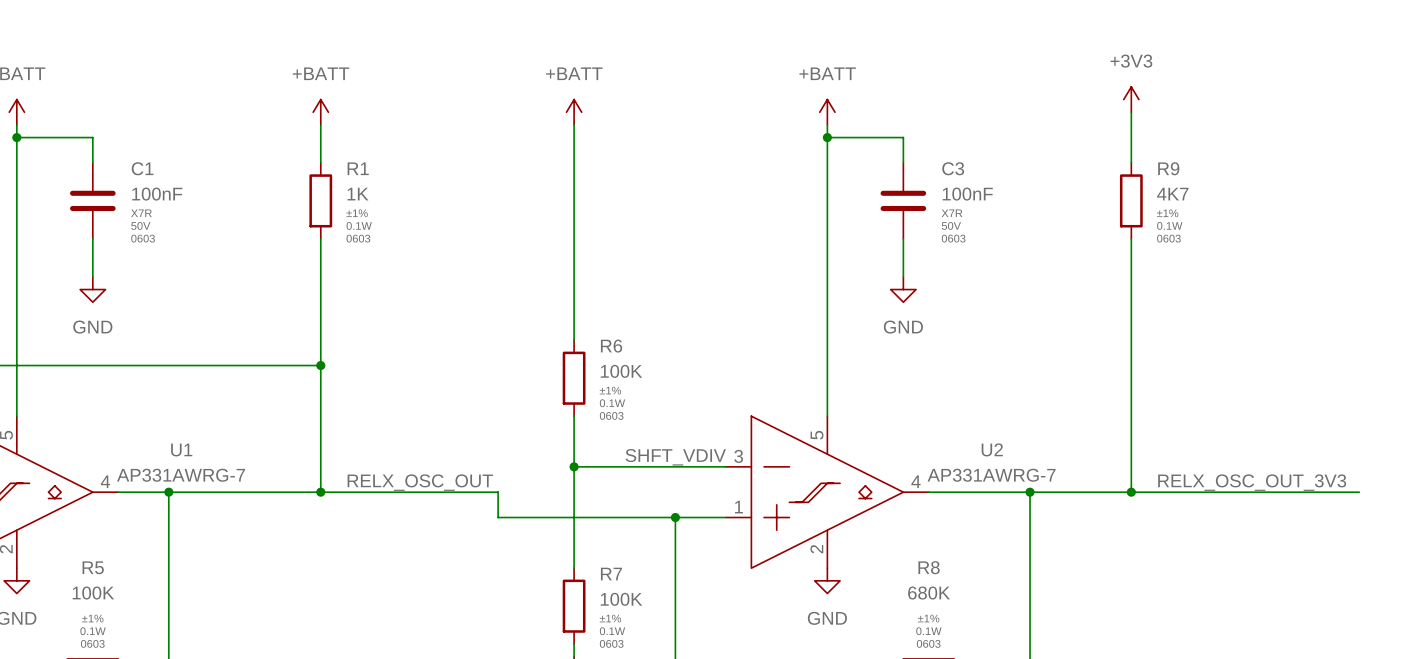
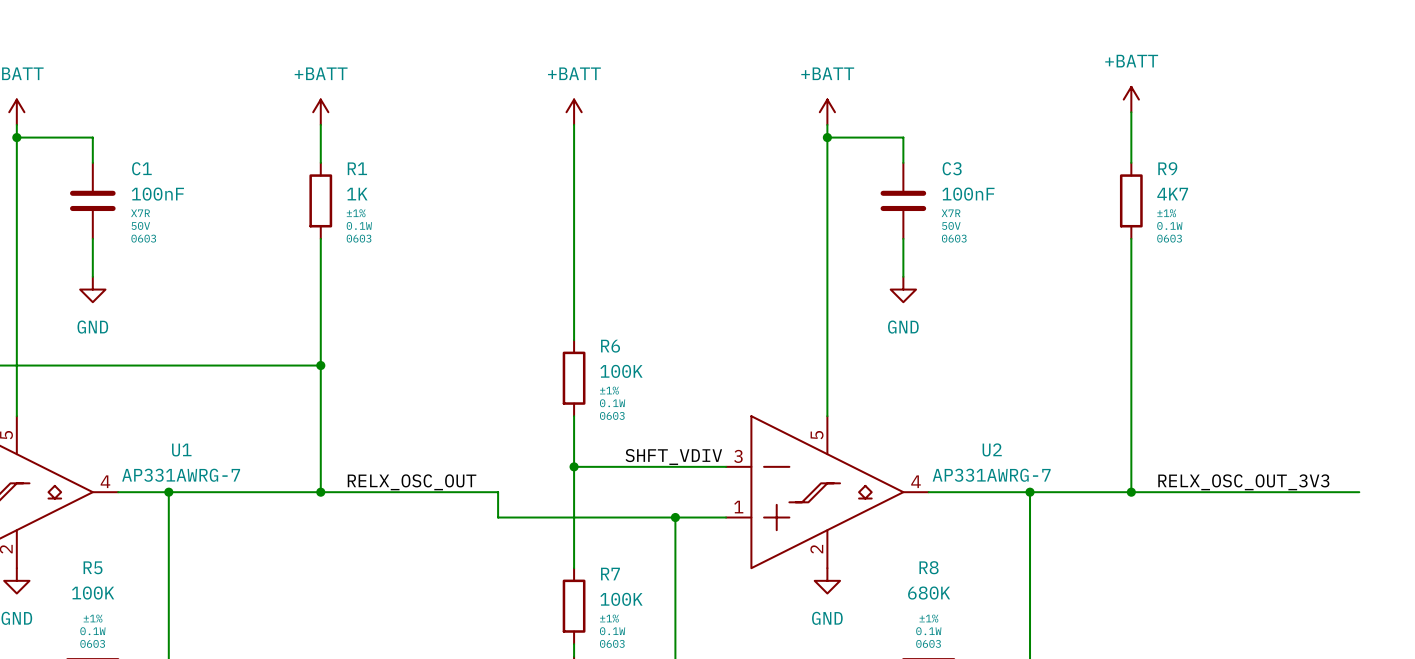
power symbol: +3V3 (1131, 99) -> +BATT (1131, 99)

